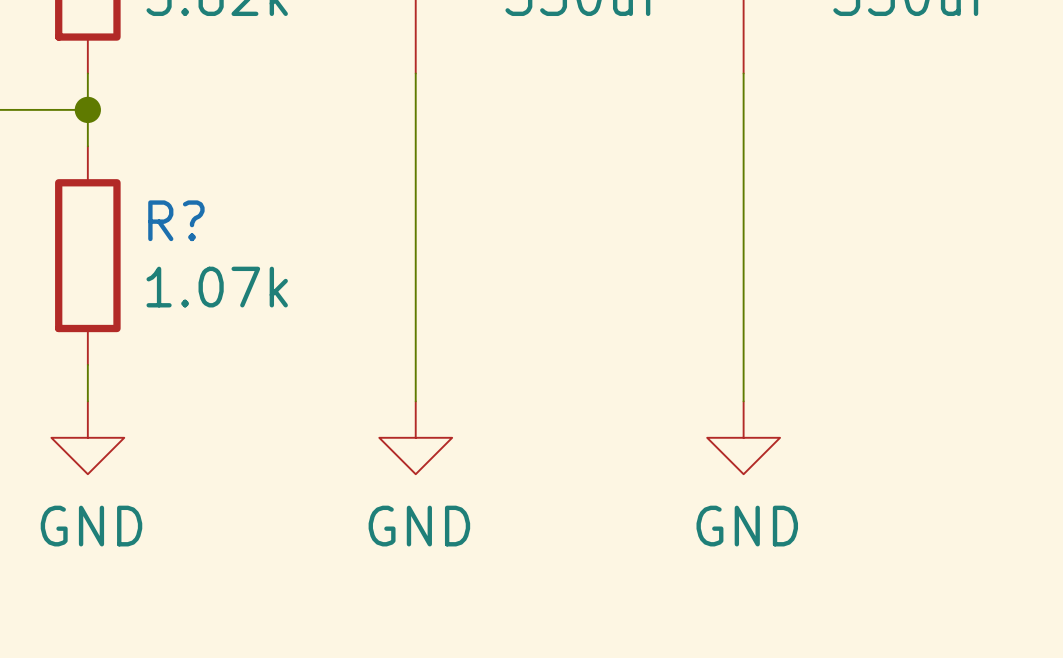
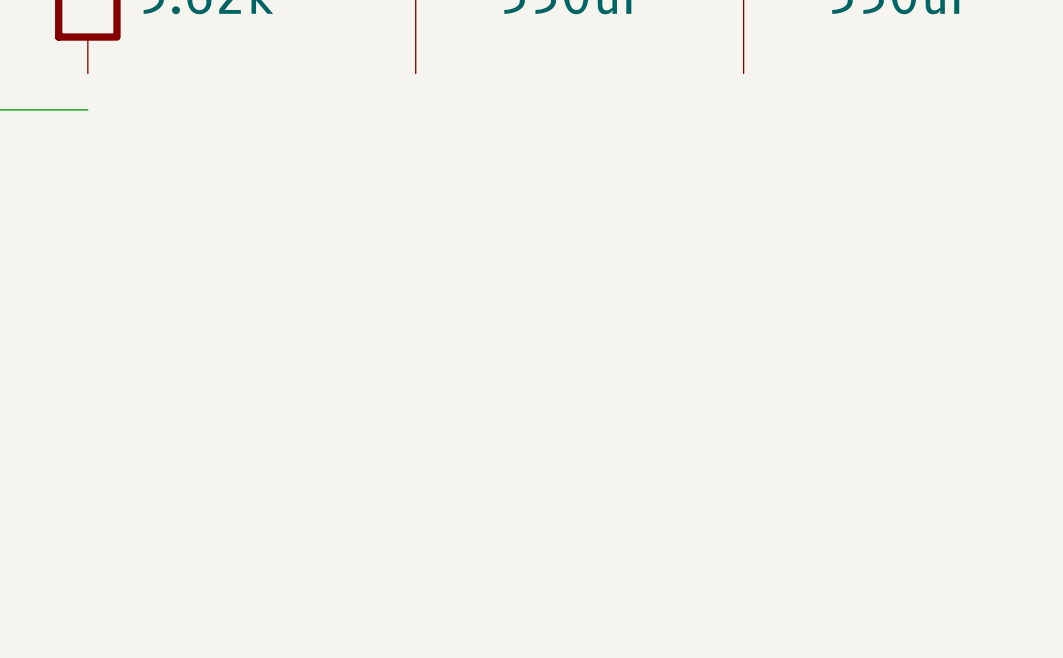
wire: (87, 73) (87, 146) -> none
wire: (415, 73) (415, 401) -> none
wire: (743, 73) (743, 401) -> none
junction: (87, 109) -> none
R?: 1.07k (87, 255) -> none
wire: (87, 364) (87, 401) -> none
power symbol: GND (87, 437) -> none
power symbol: GND (415, 437) -> none
power symbol: GND (743, 437) -> none

